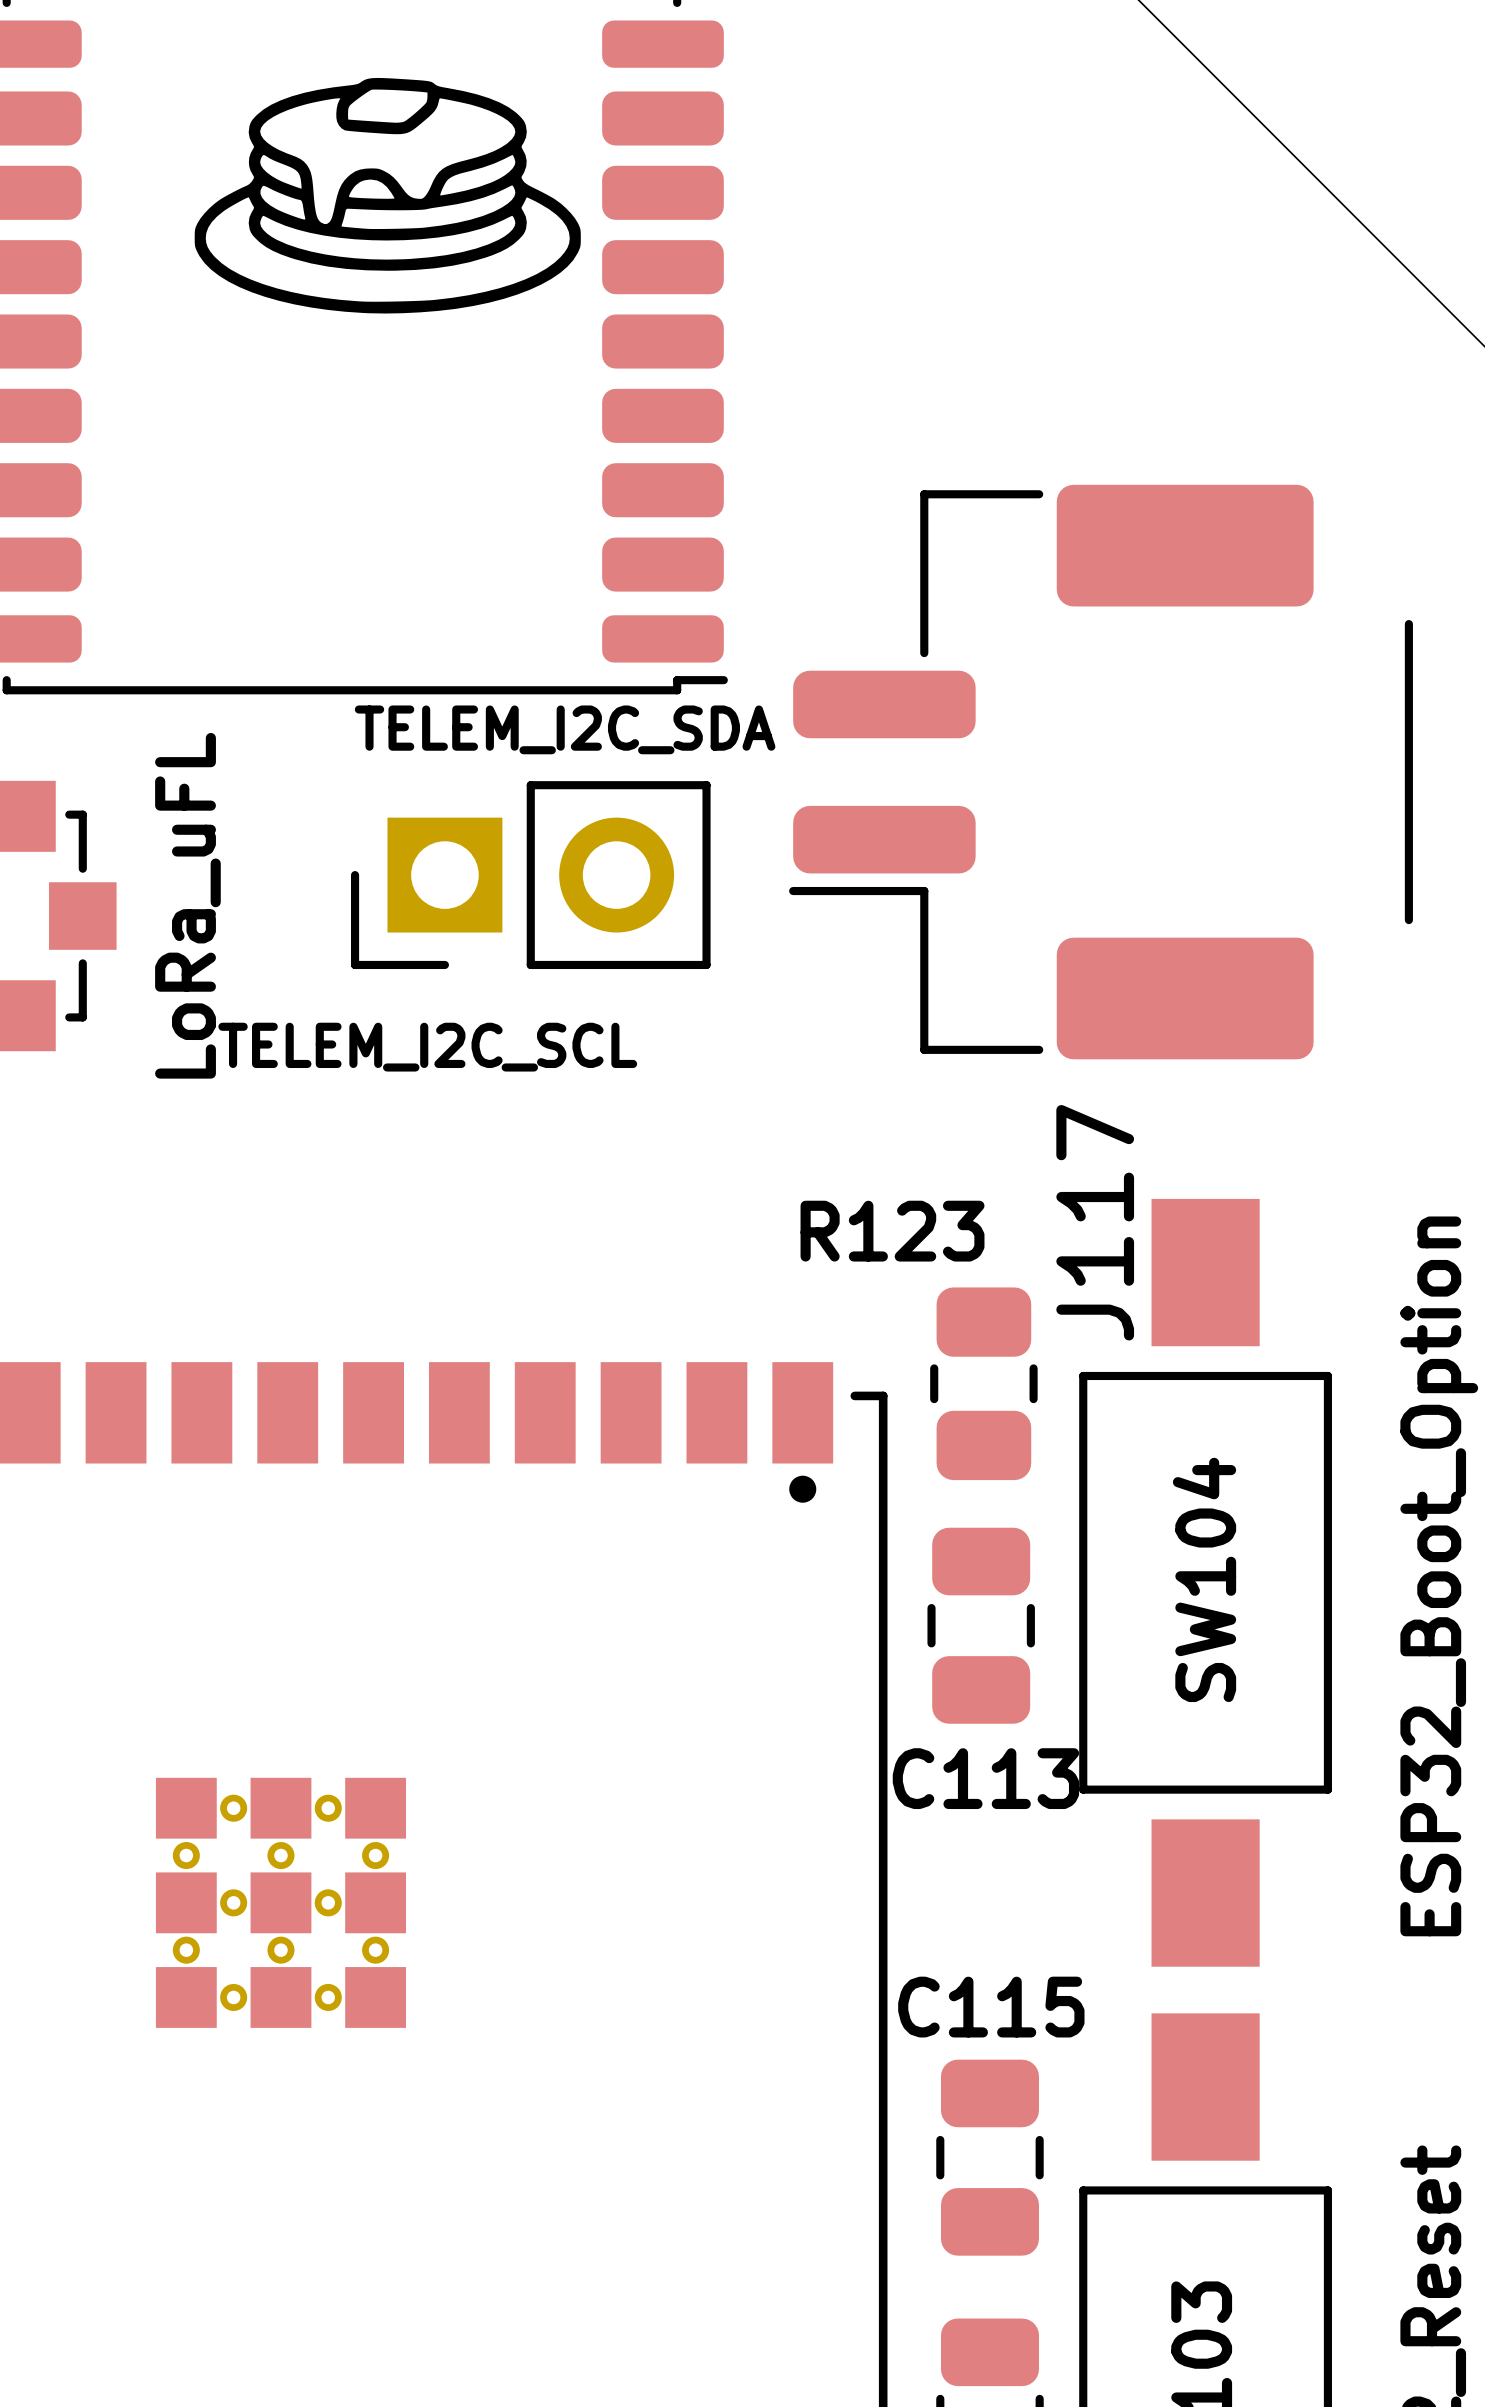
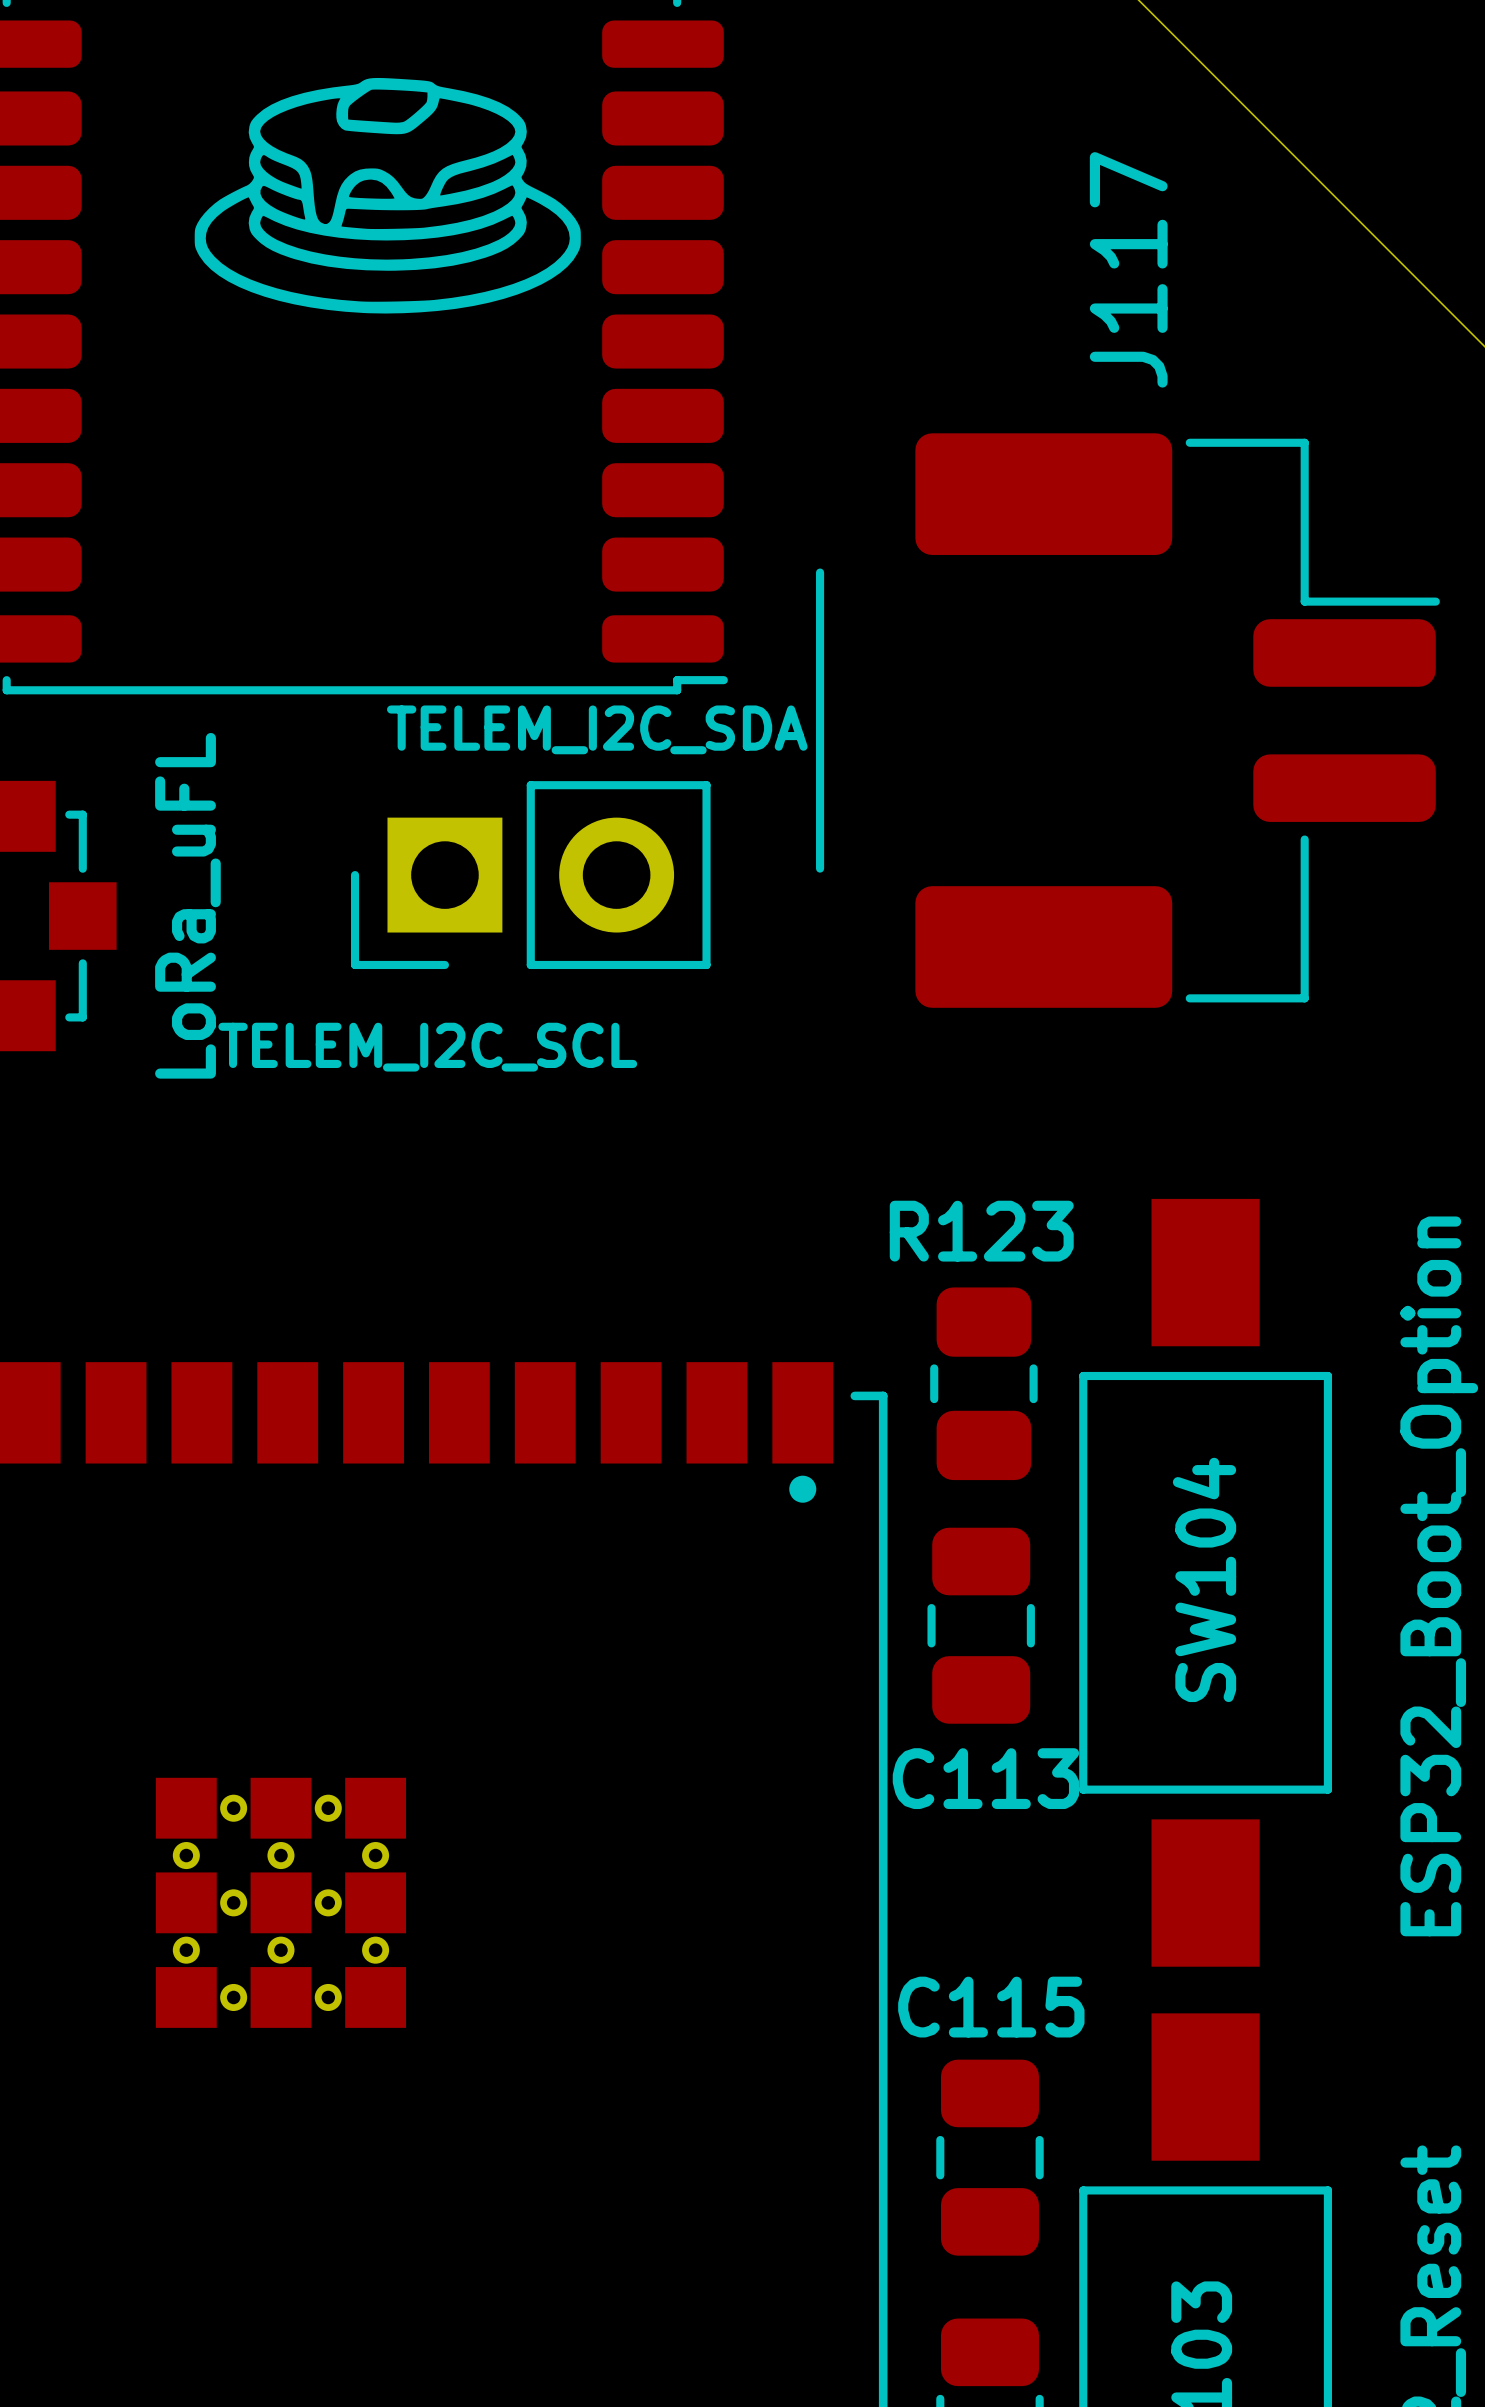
text position: TELEM_I2C_SDA (565, 729) -> TELEM_I2C_SDA (597, 729)
J117 rotation: 0° (1101, 772) -> 180° (1127, 720)
R123 name position: R123 (892, 1231) -> R123 (981, 1231)

